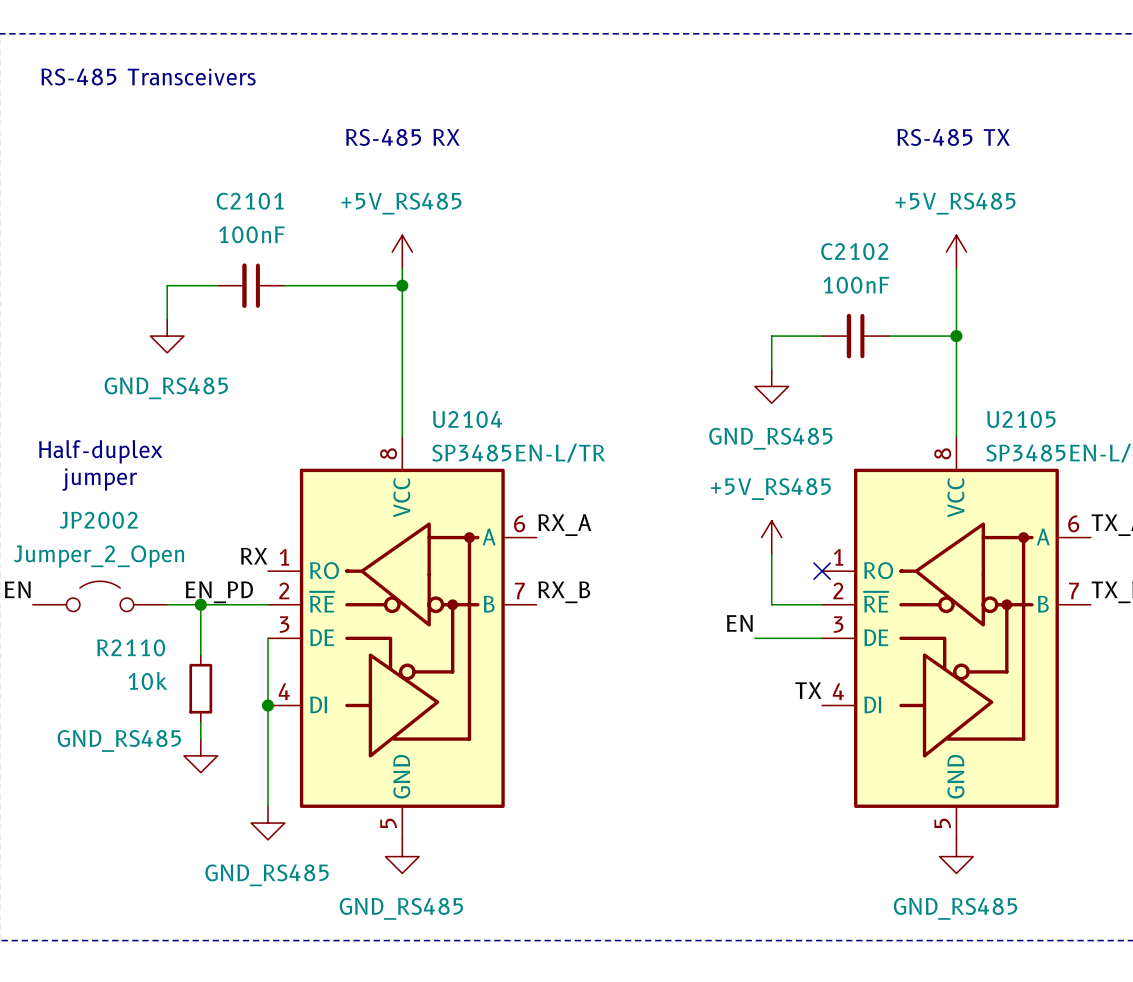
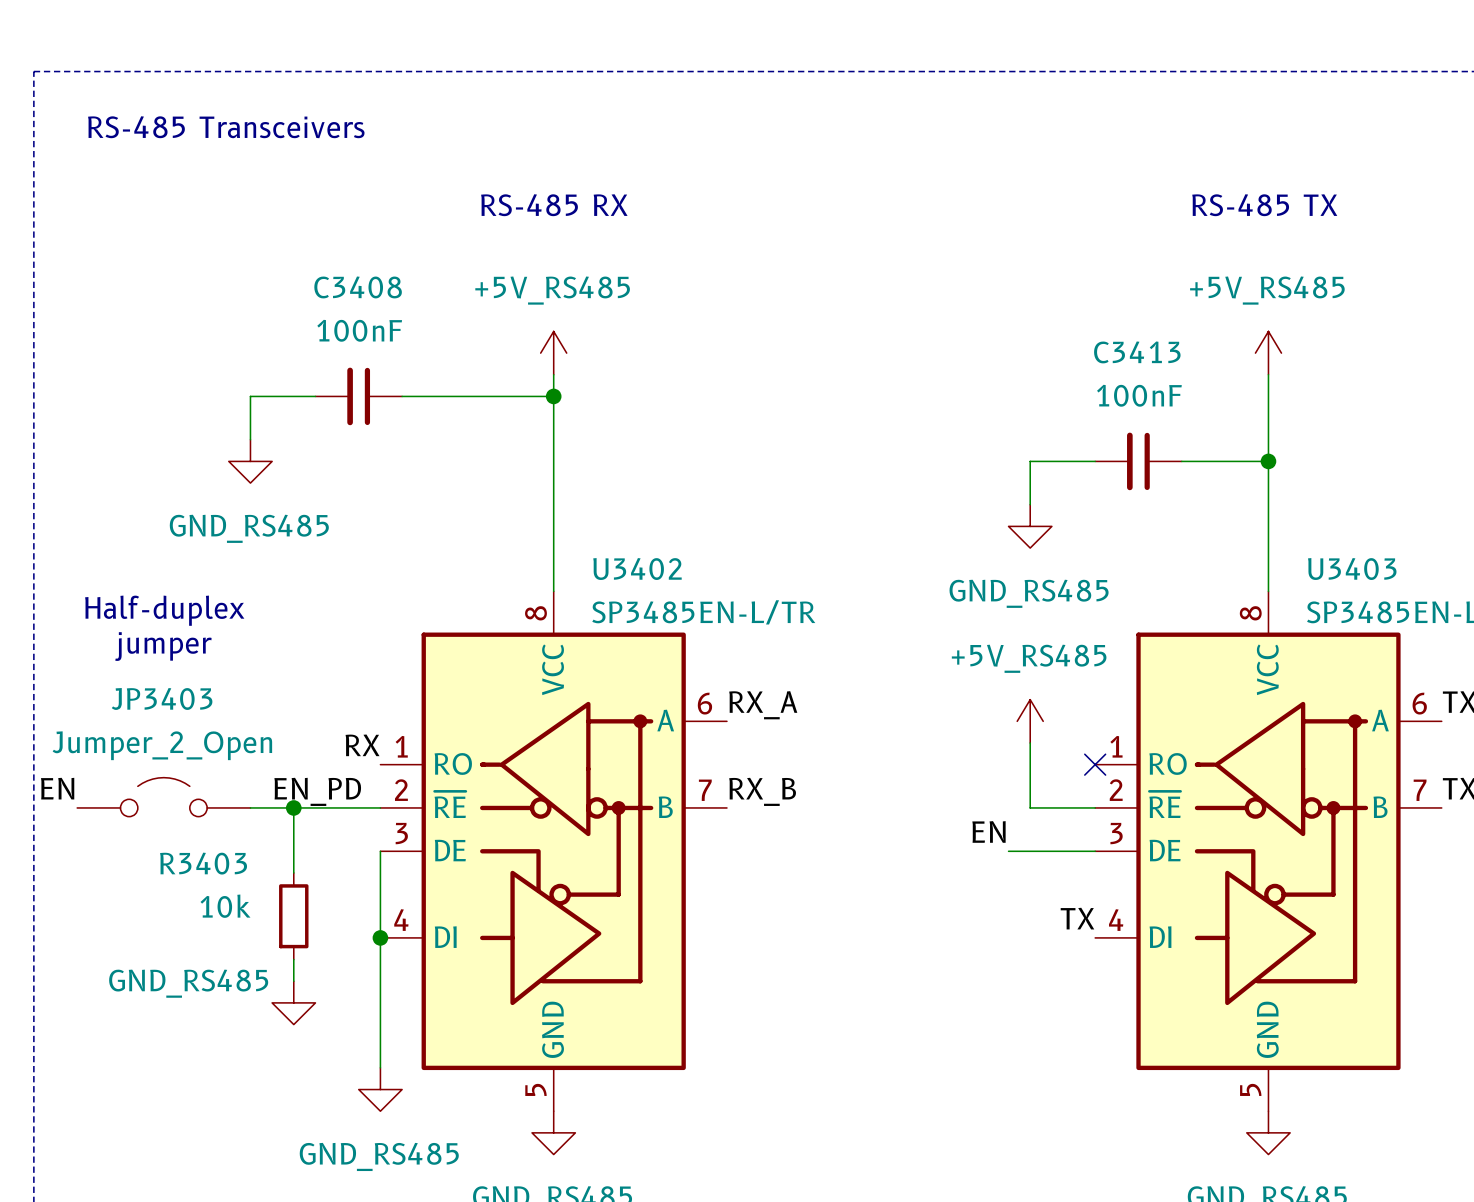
C2101 name: C2101 (250, 201) -> C3408 (358, 287)
C2102 name: C2102 (854, 251) -> C3413 (1137, 352)
U2104 name: U2104 (467, 419) -> U3402 (637, 569)
U2105 name: U2105 (1021, 419) -> U3403 (1352, 569)
JP2002 name: JP2002 (98, 520) -> JP3403 (162, 698)
R2110 name: R2110 (131, 647) -> R3403 (203, 863)

